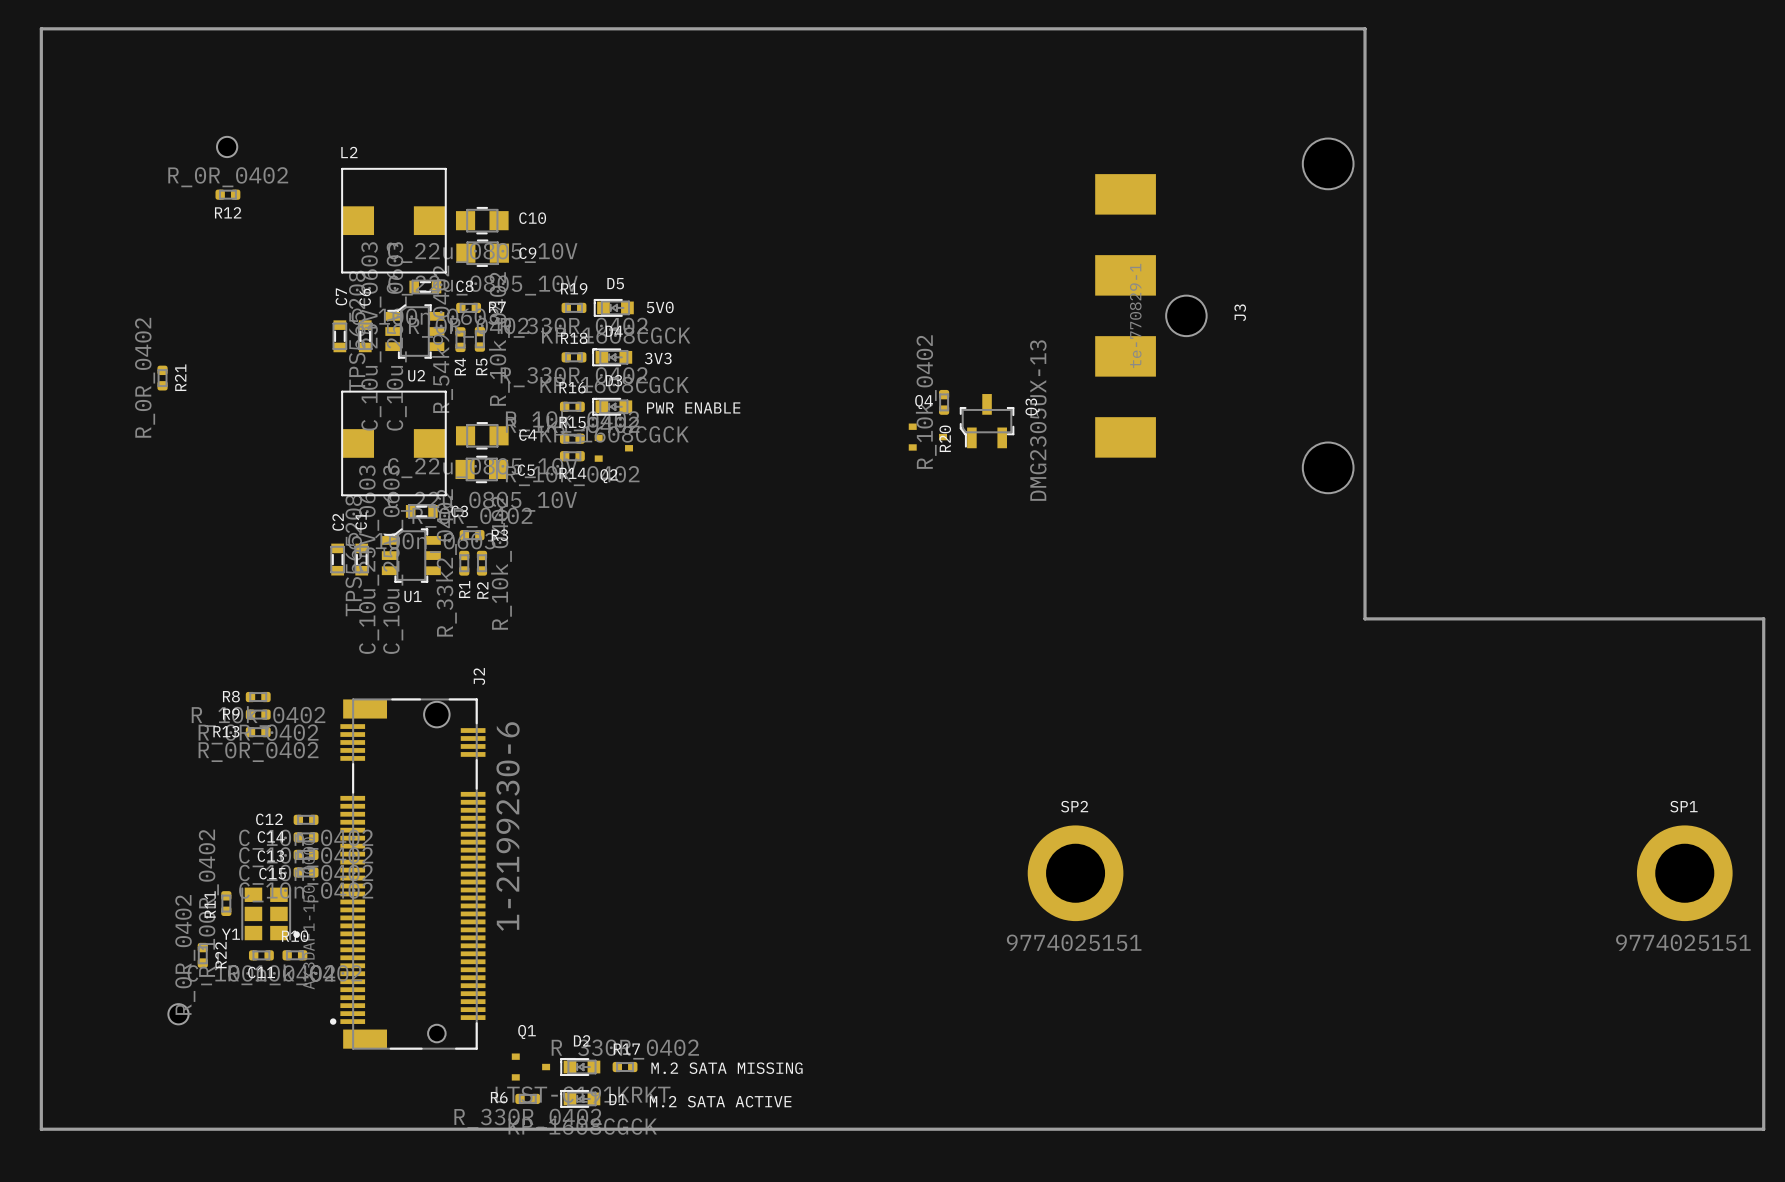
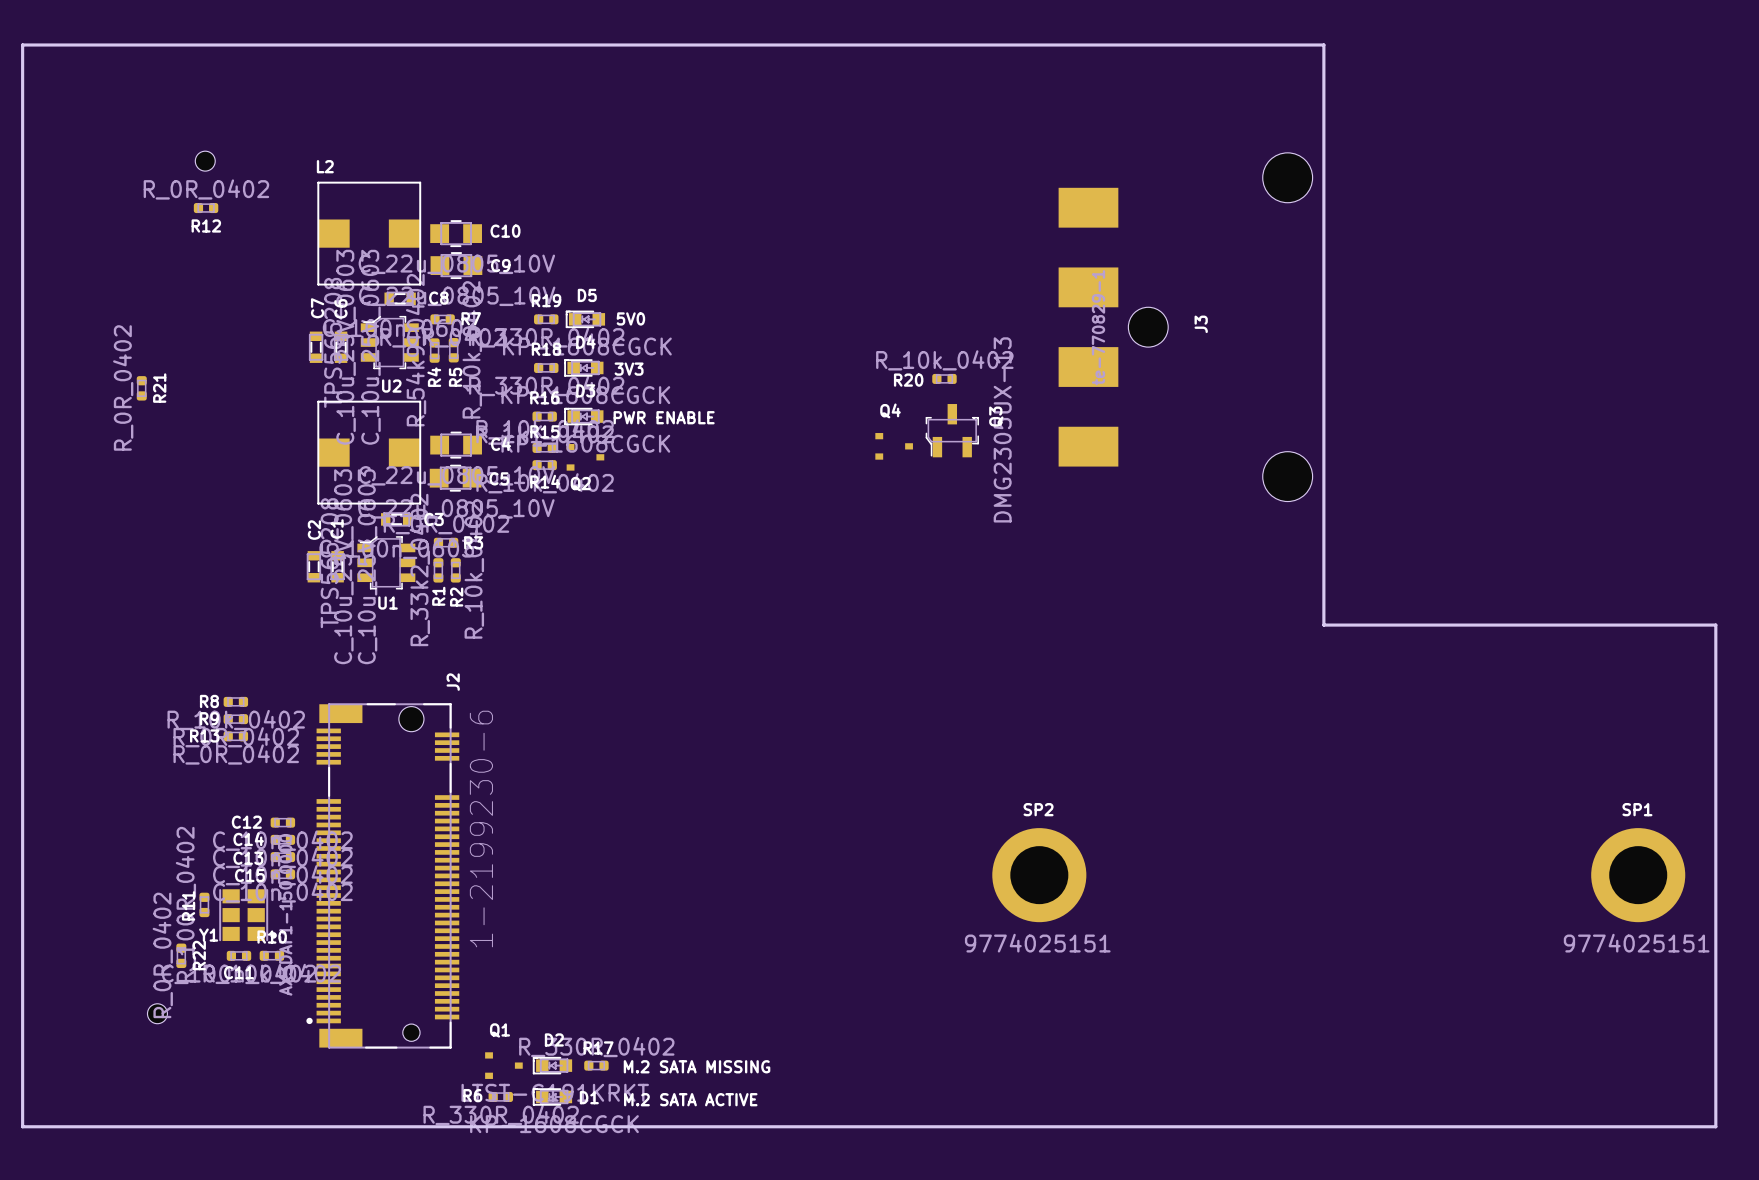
R20 rotation: 0° (944, 402) -> 90° clockwise (944, 378)
R20 position: (944, 402) -> (944, 378)

